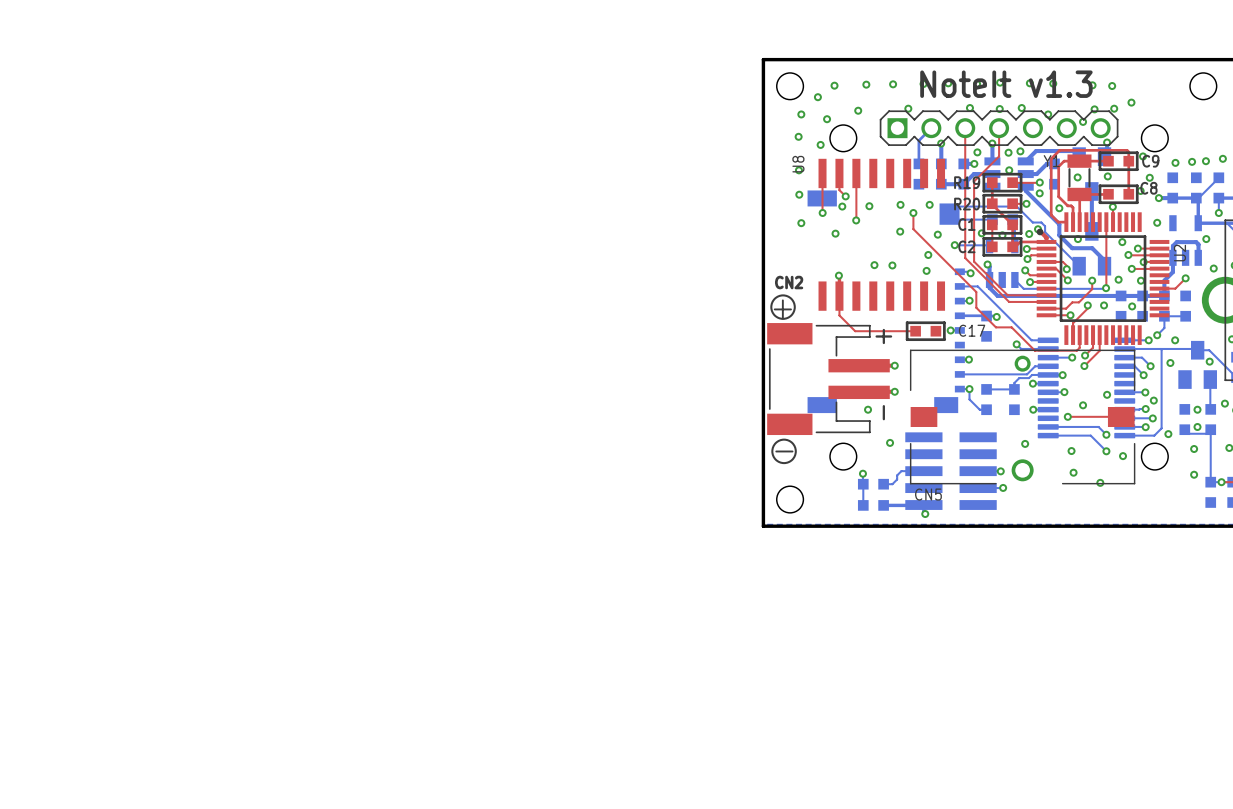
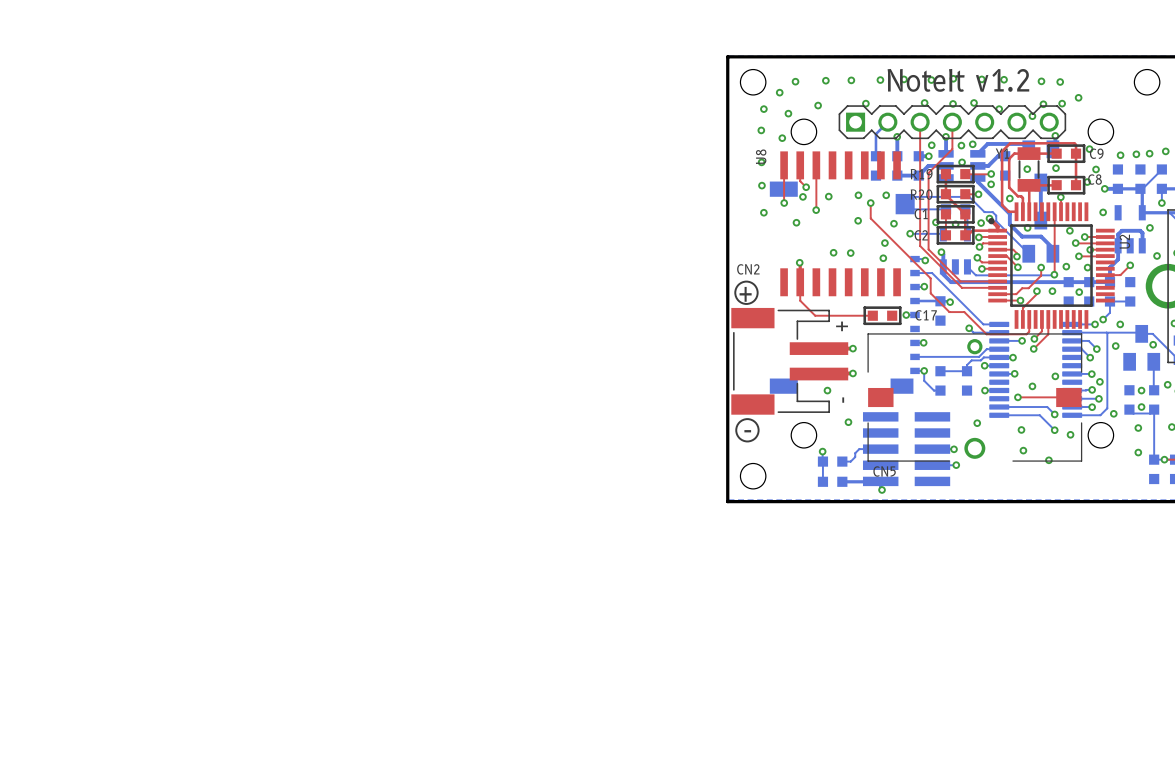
text: NoteIt v1.3 (1006, 84) -> NoteIt v1.2 (958, 80)

